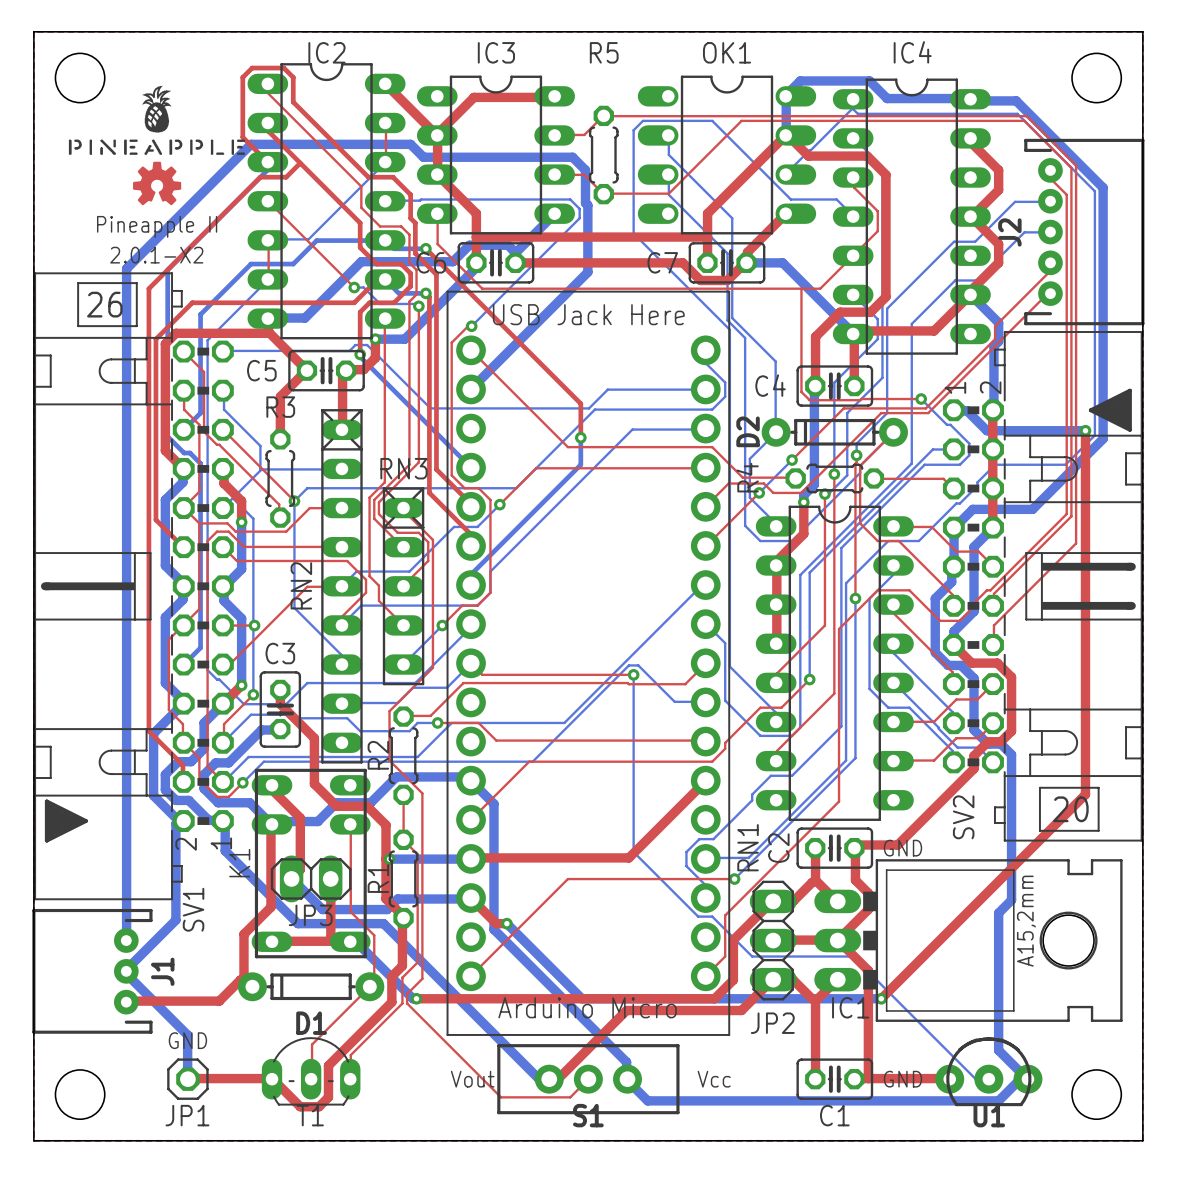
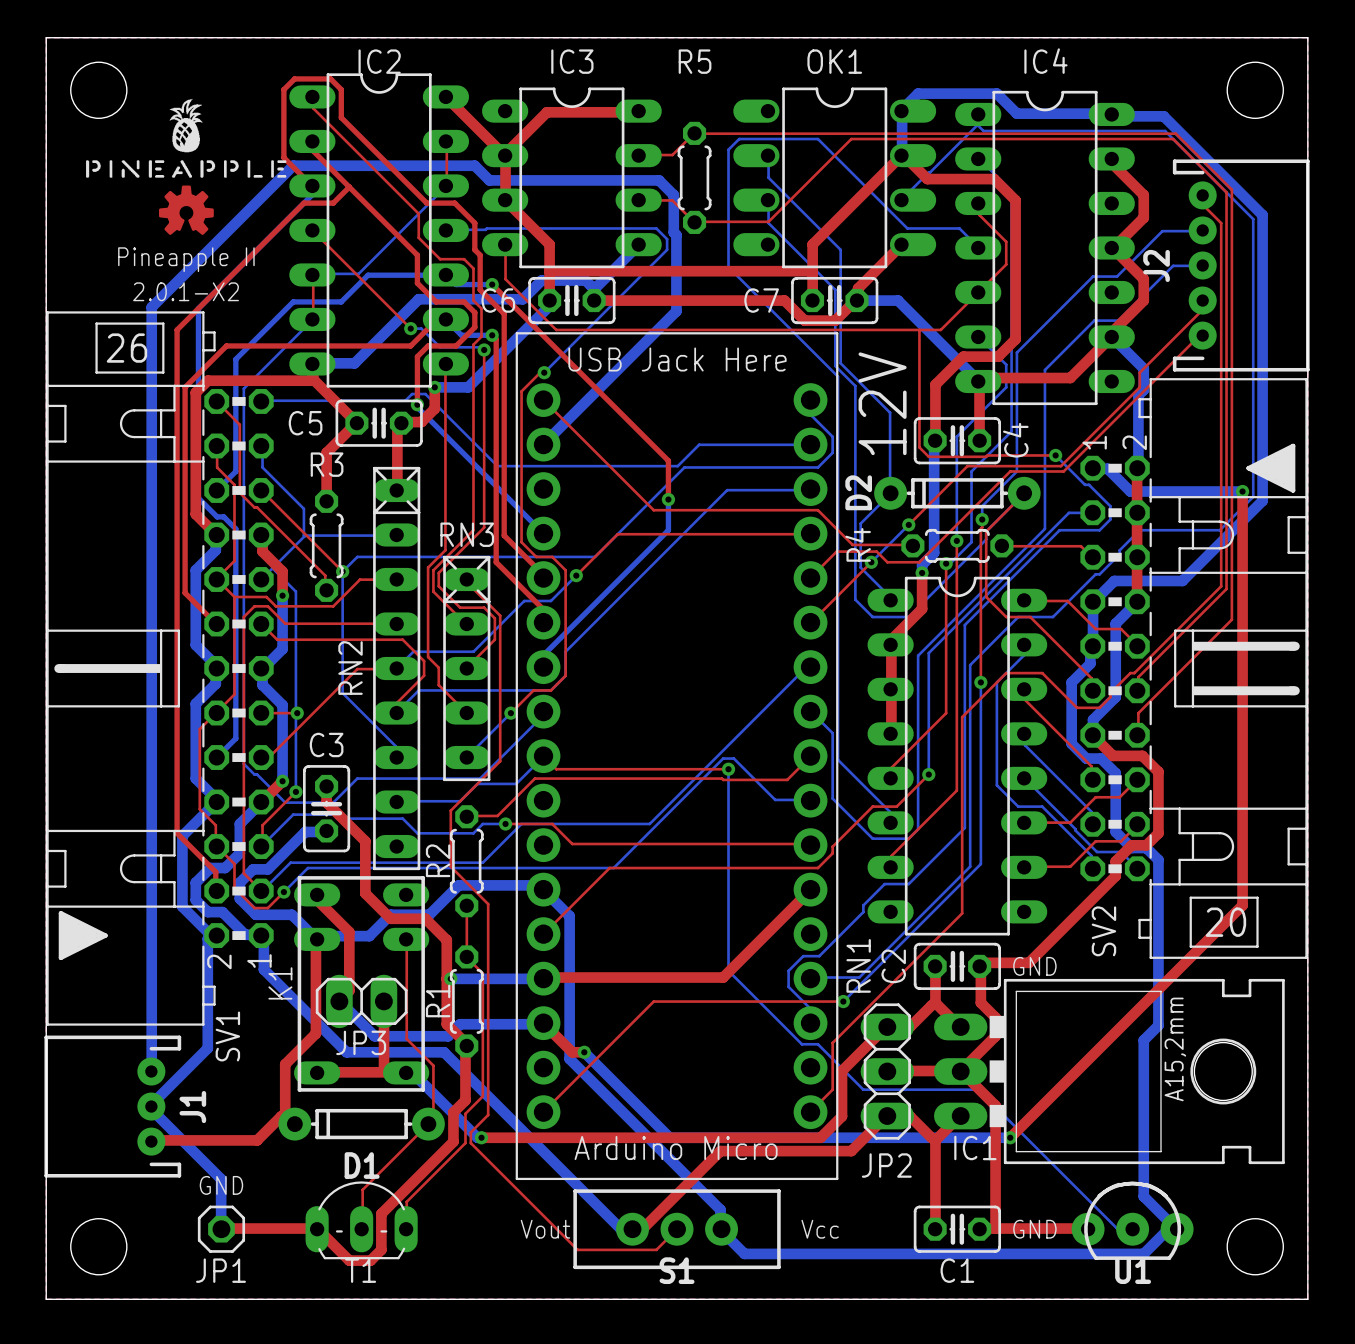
text: none -> 12V (882, 403)
C4 name rotation: 0° (770, 385) -> 90° counterclockwise (1015, 440)
C4 name position: C4 (770, 385) -> C4 (1015, 440)

